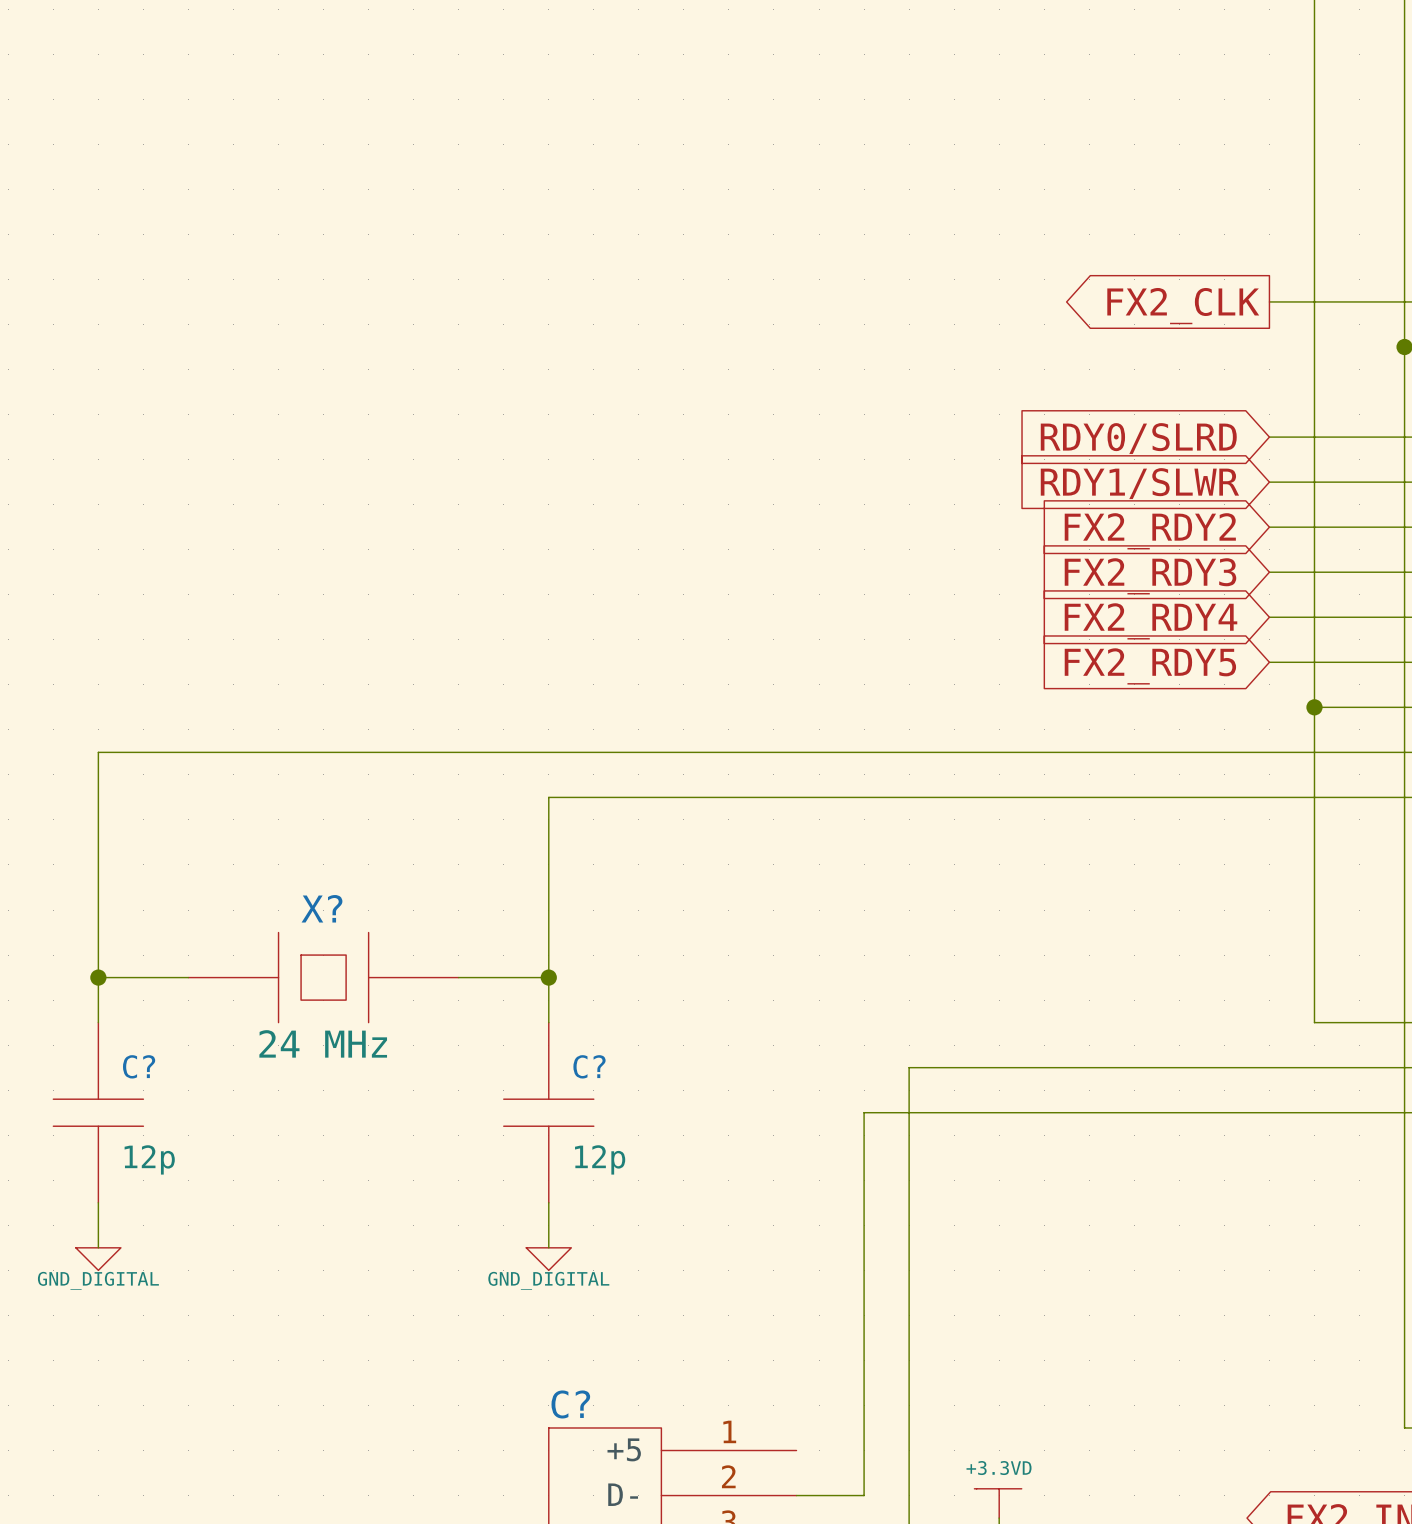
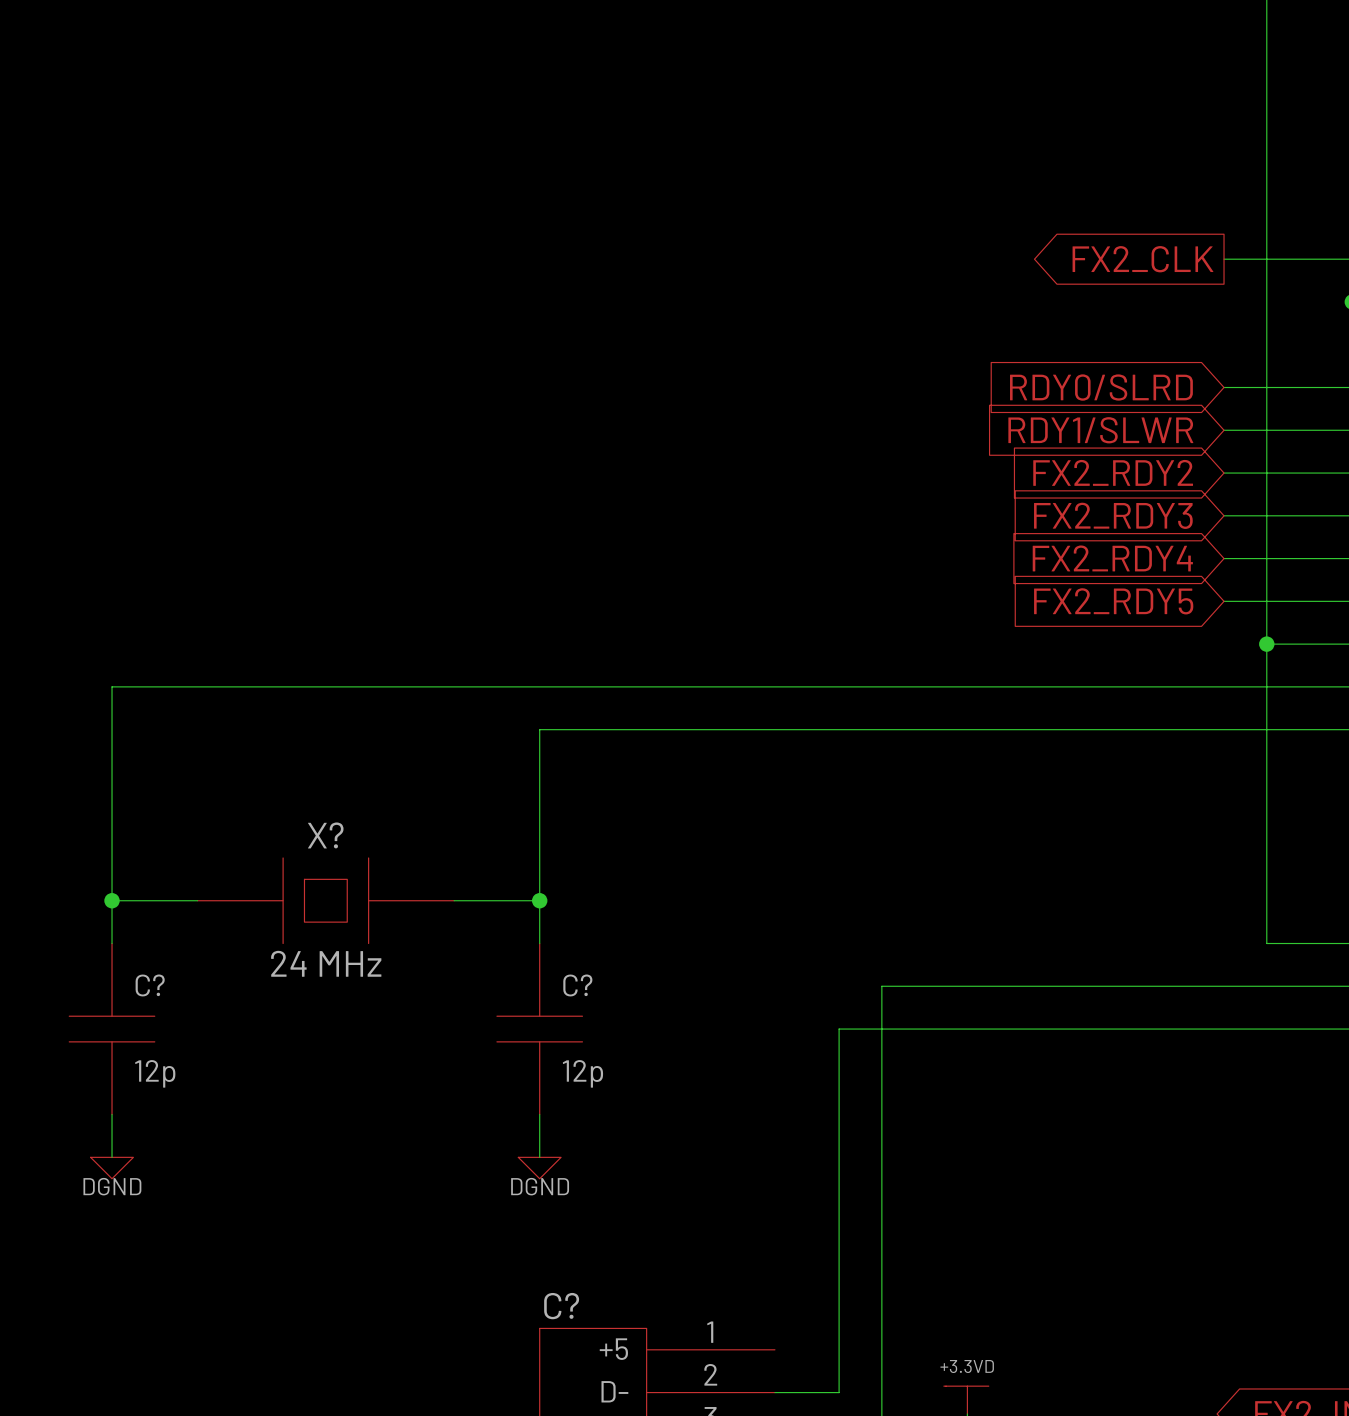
power symbol: GND_DIGITAL (98, 1259) -> DGND (112, 1168)
power symbol: GND_DIGITAL (548, 1259) -> DGND (539, 1168)

